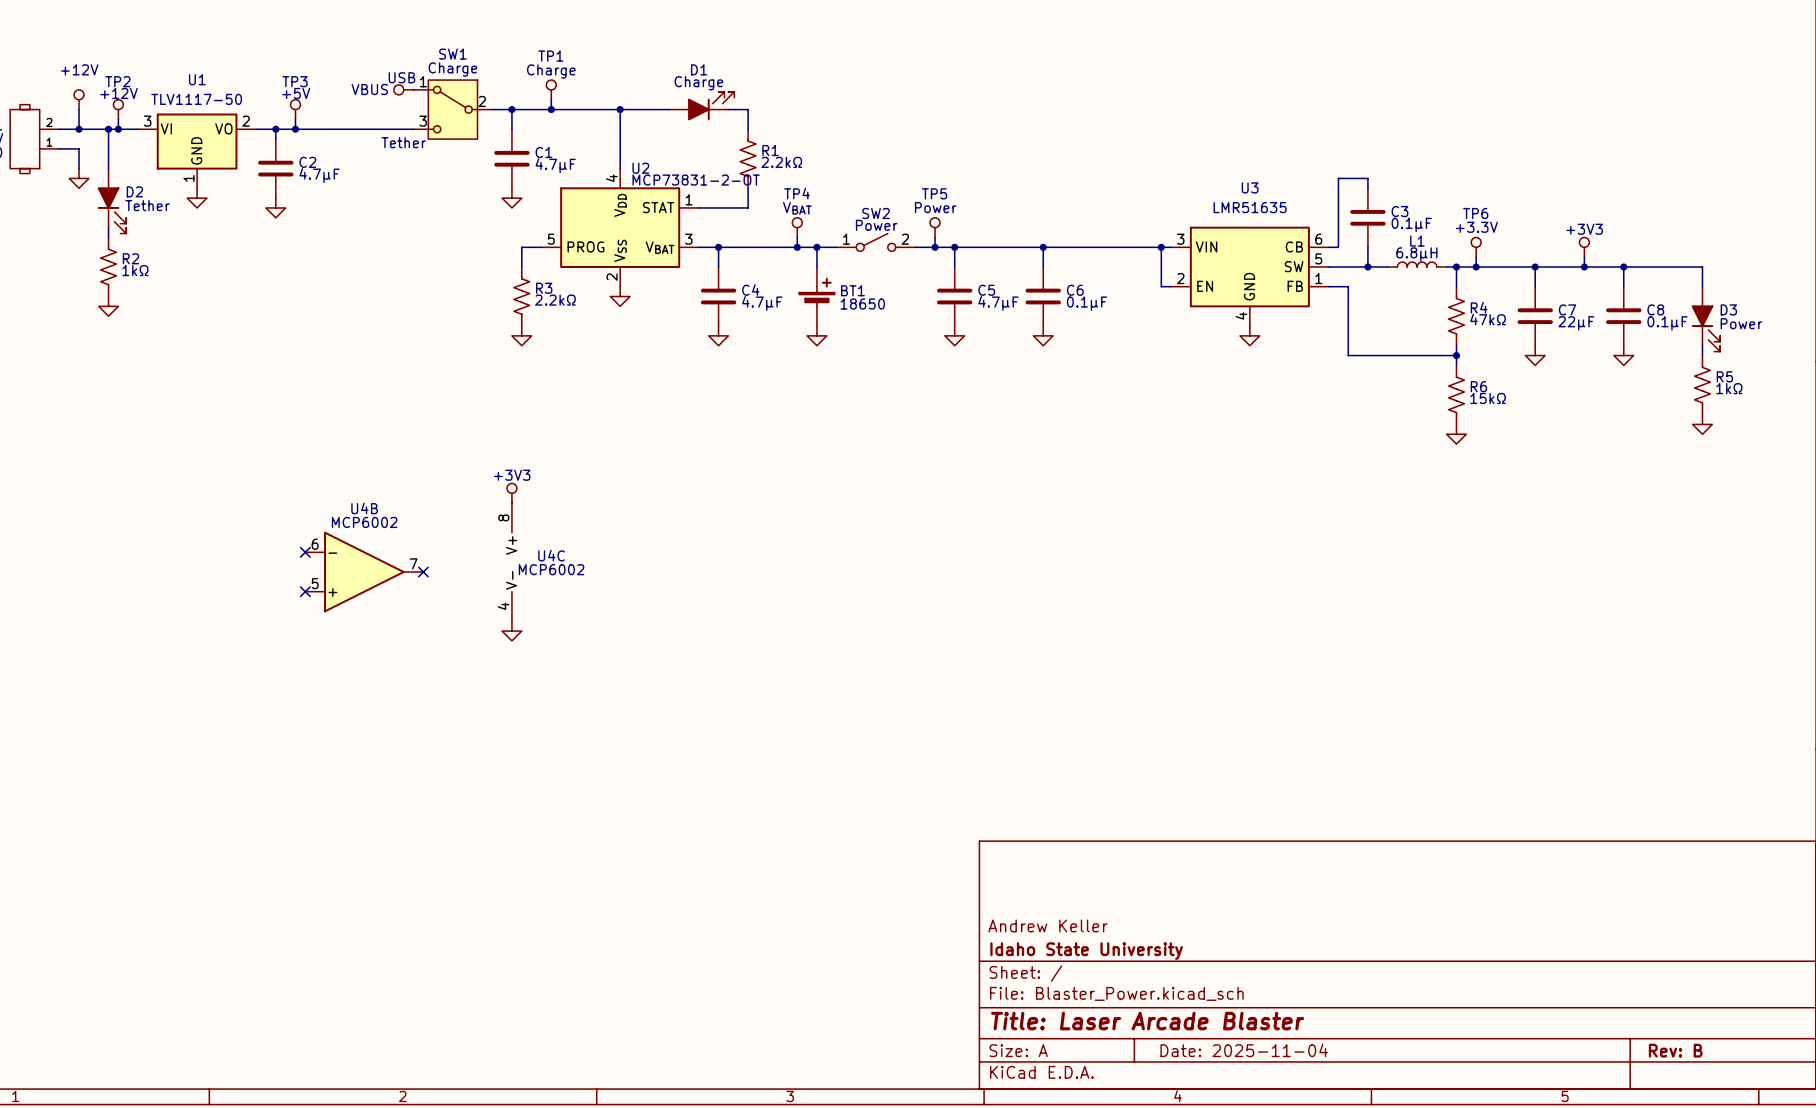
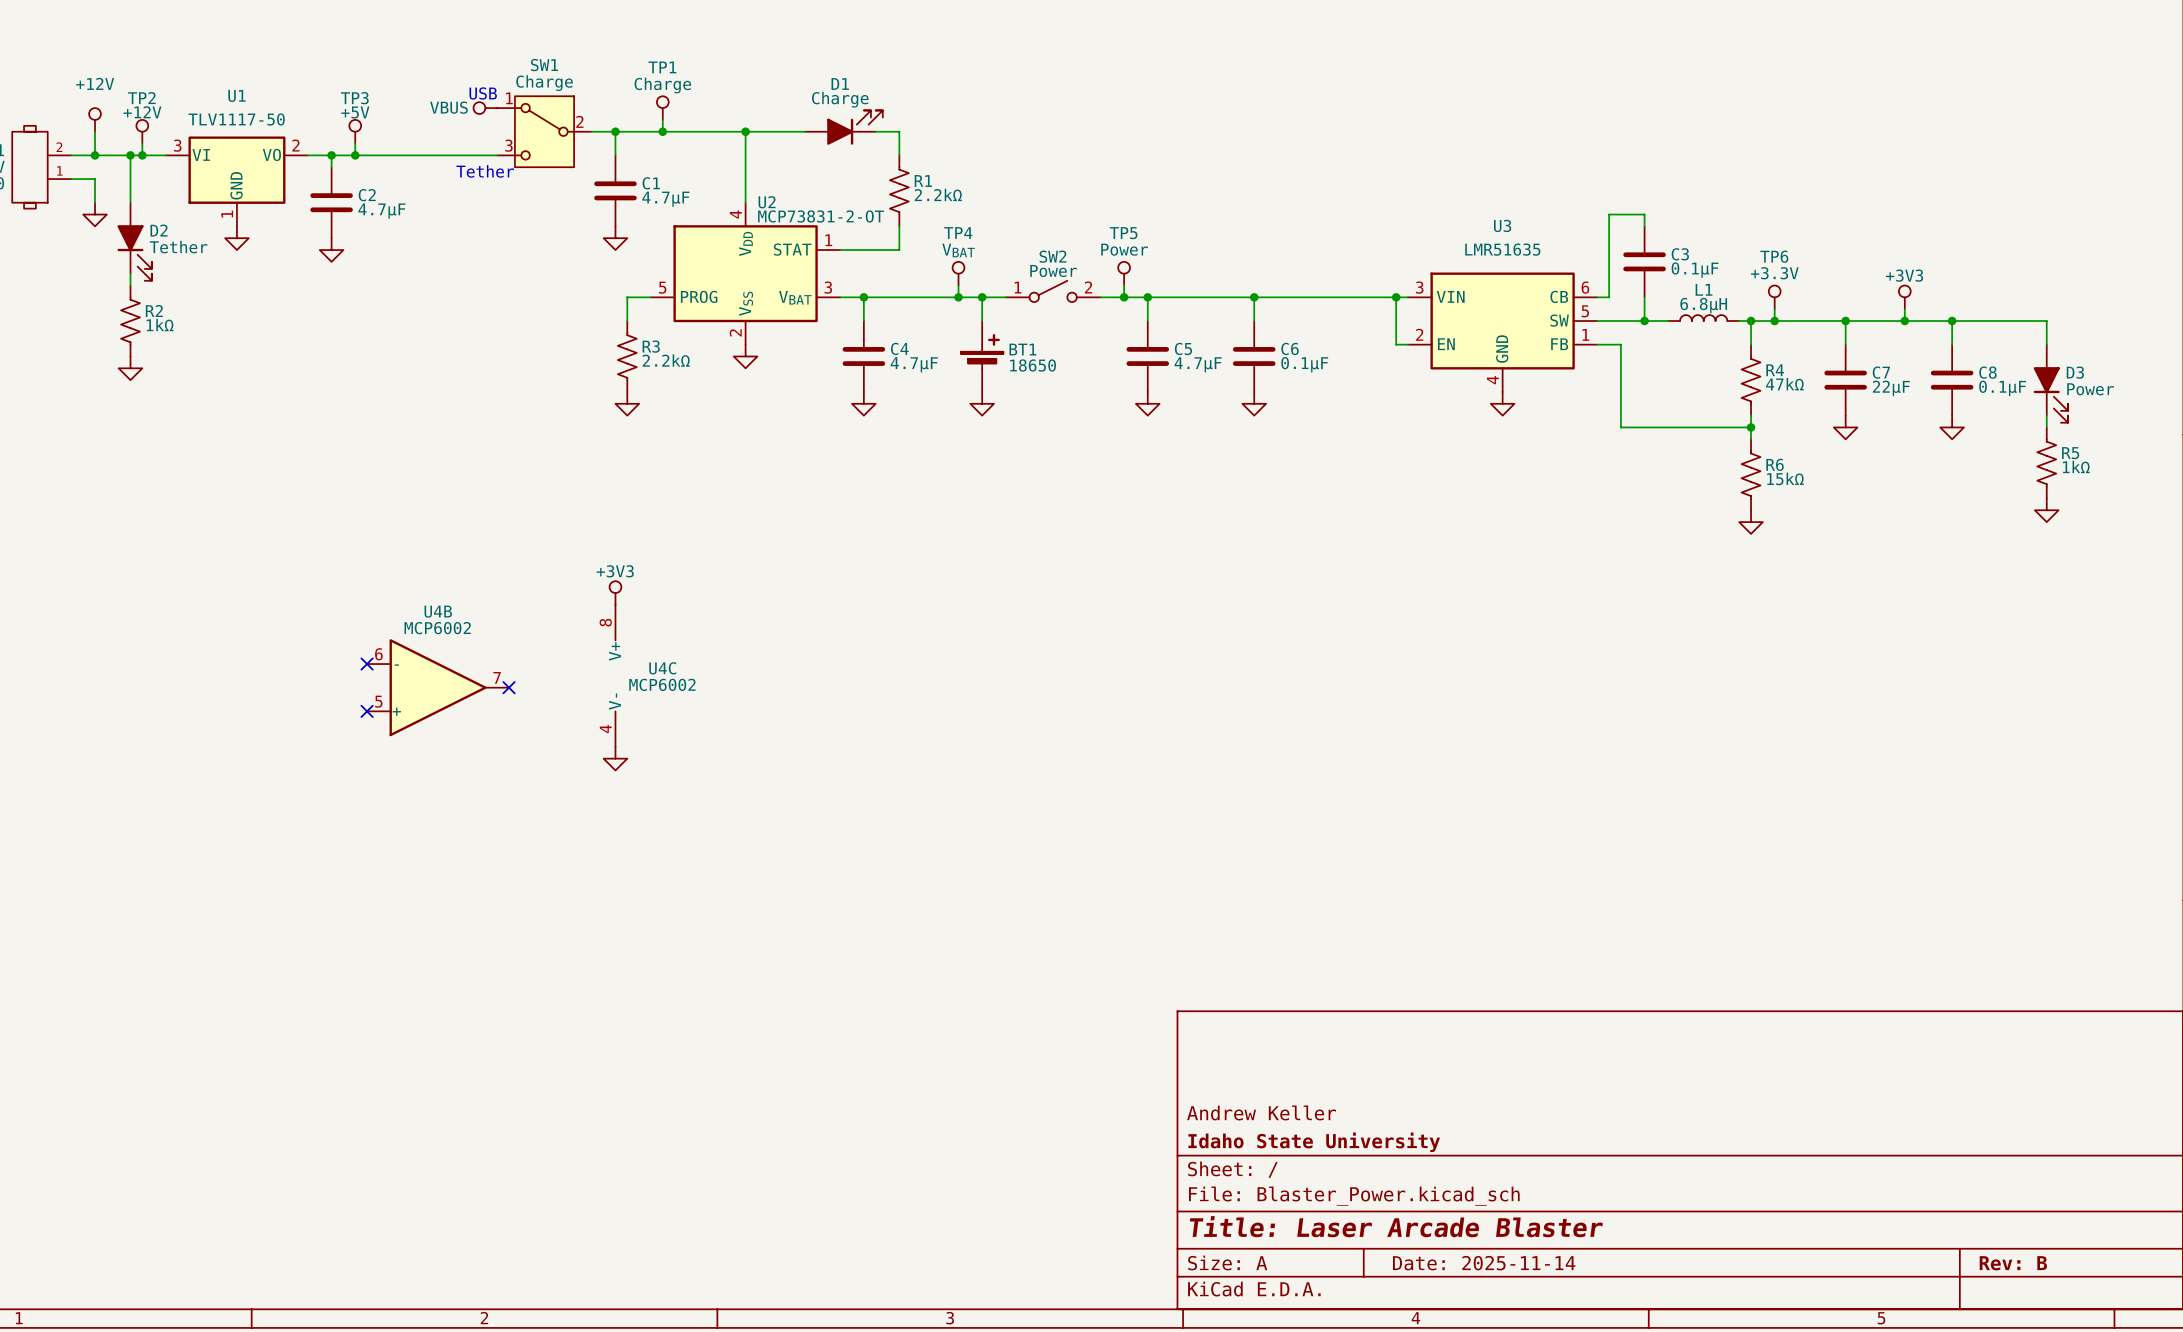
title block: Date: 2025-11-04 (1244, 1050) -> Date: 2025-11-14 (1484, 1263)

